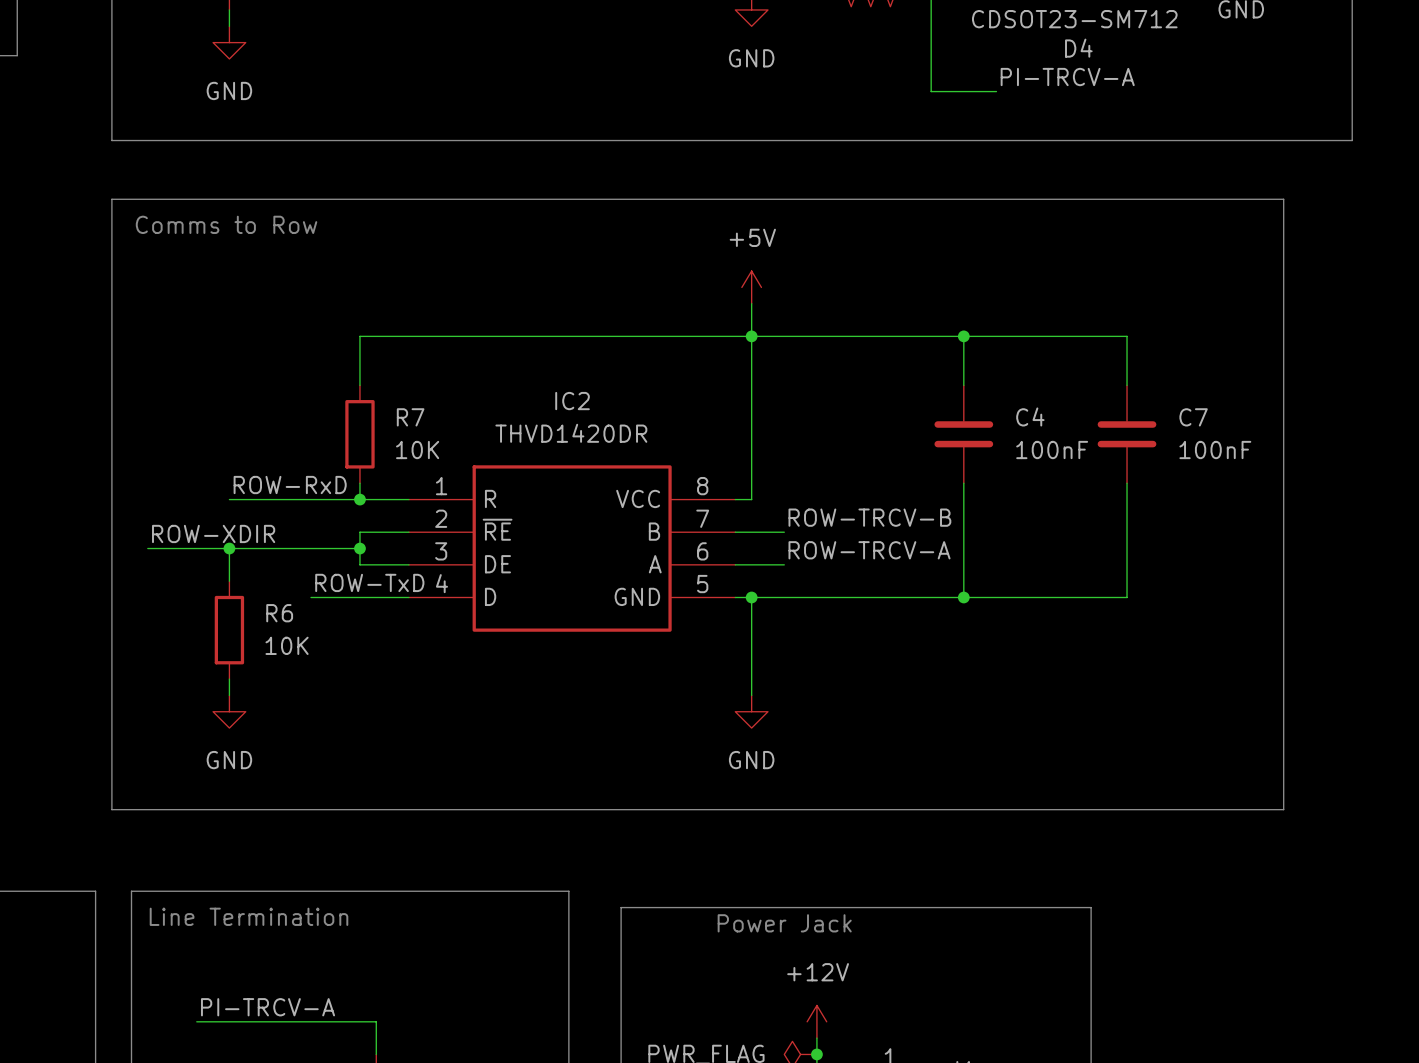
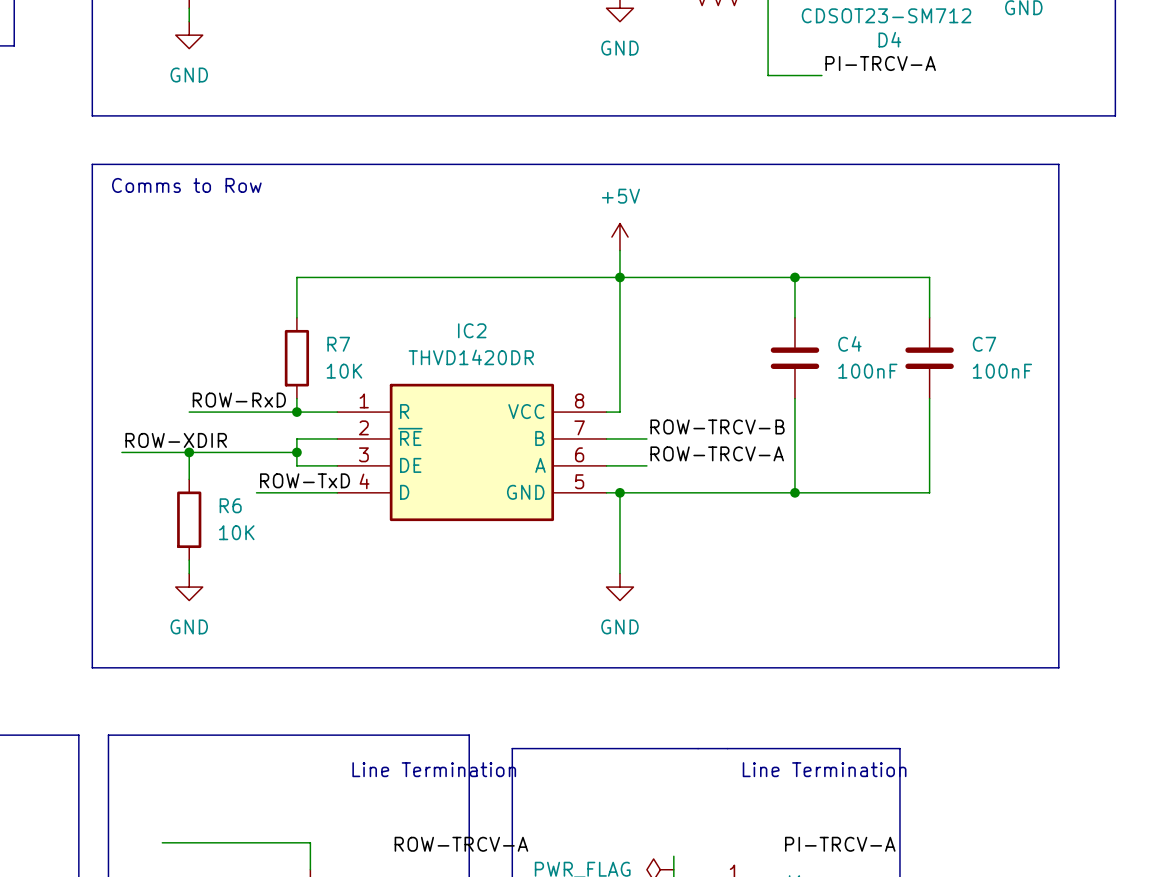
text position: Line Termination (249, 916) -> Line Termination (434, 769)
text: Power Jack (784, 923) -> none
text: none -> Line Termination (824, 769)
label: PI-TRCV-A (268, 1007) -> none
power symbol: +12V (816, 1021) -> none
label: none -> ROW-TRCV-A (461, 844)
label: none -> PI-TRCV-A (840, 844)
junction: (816, 1054) -> none

